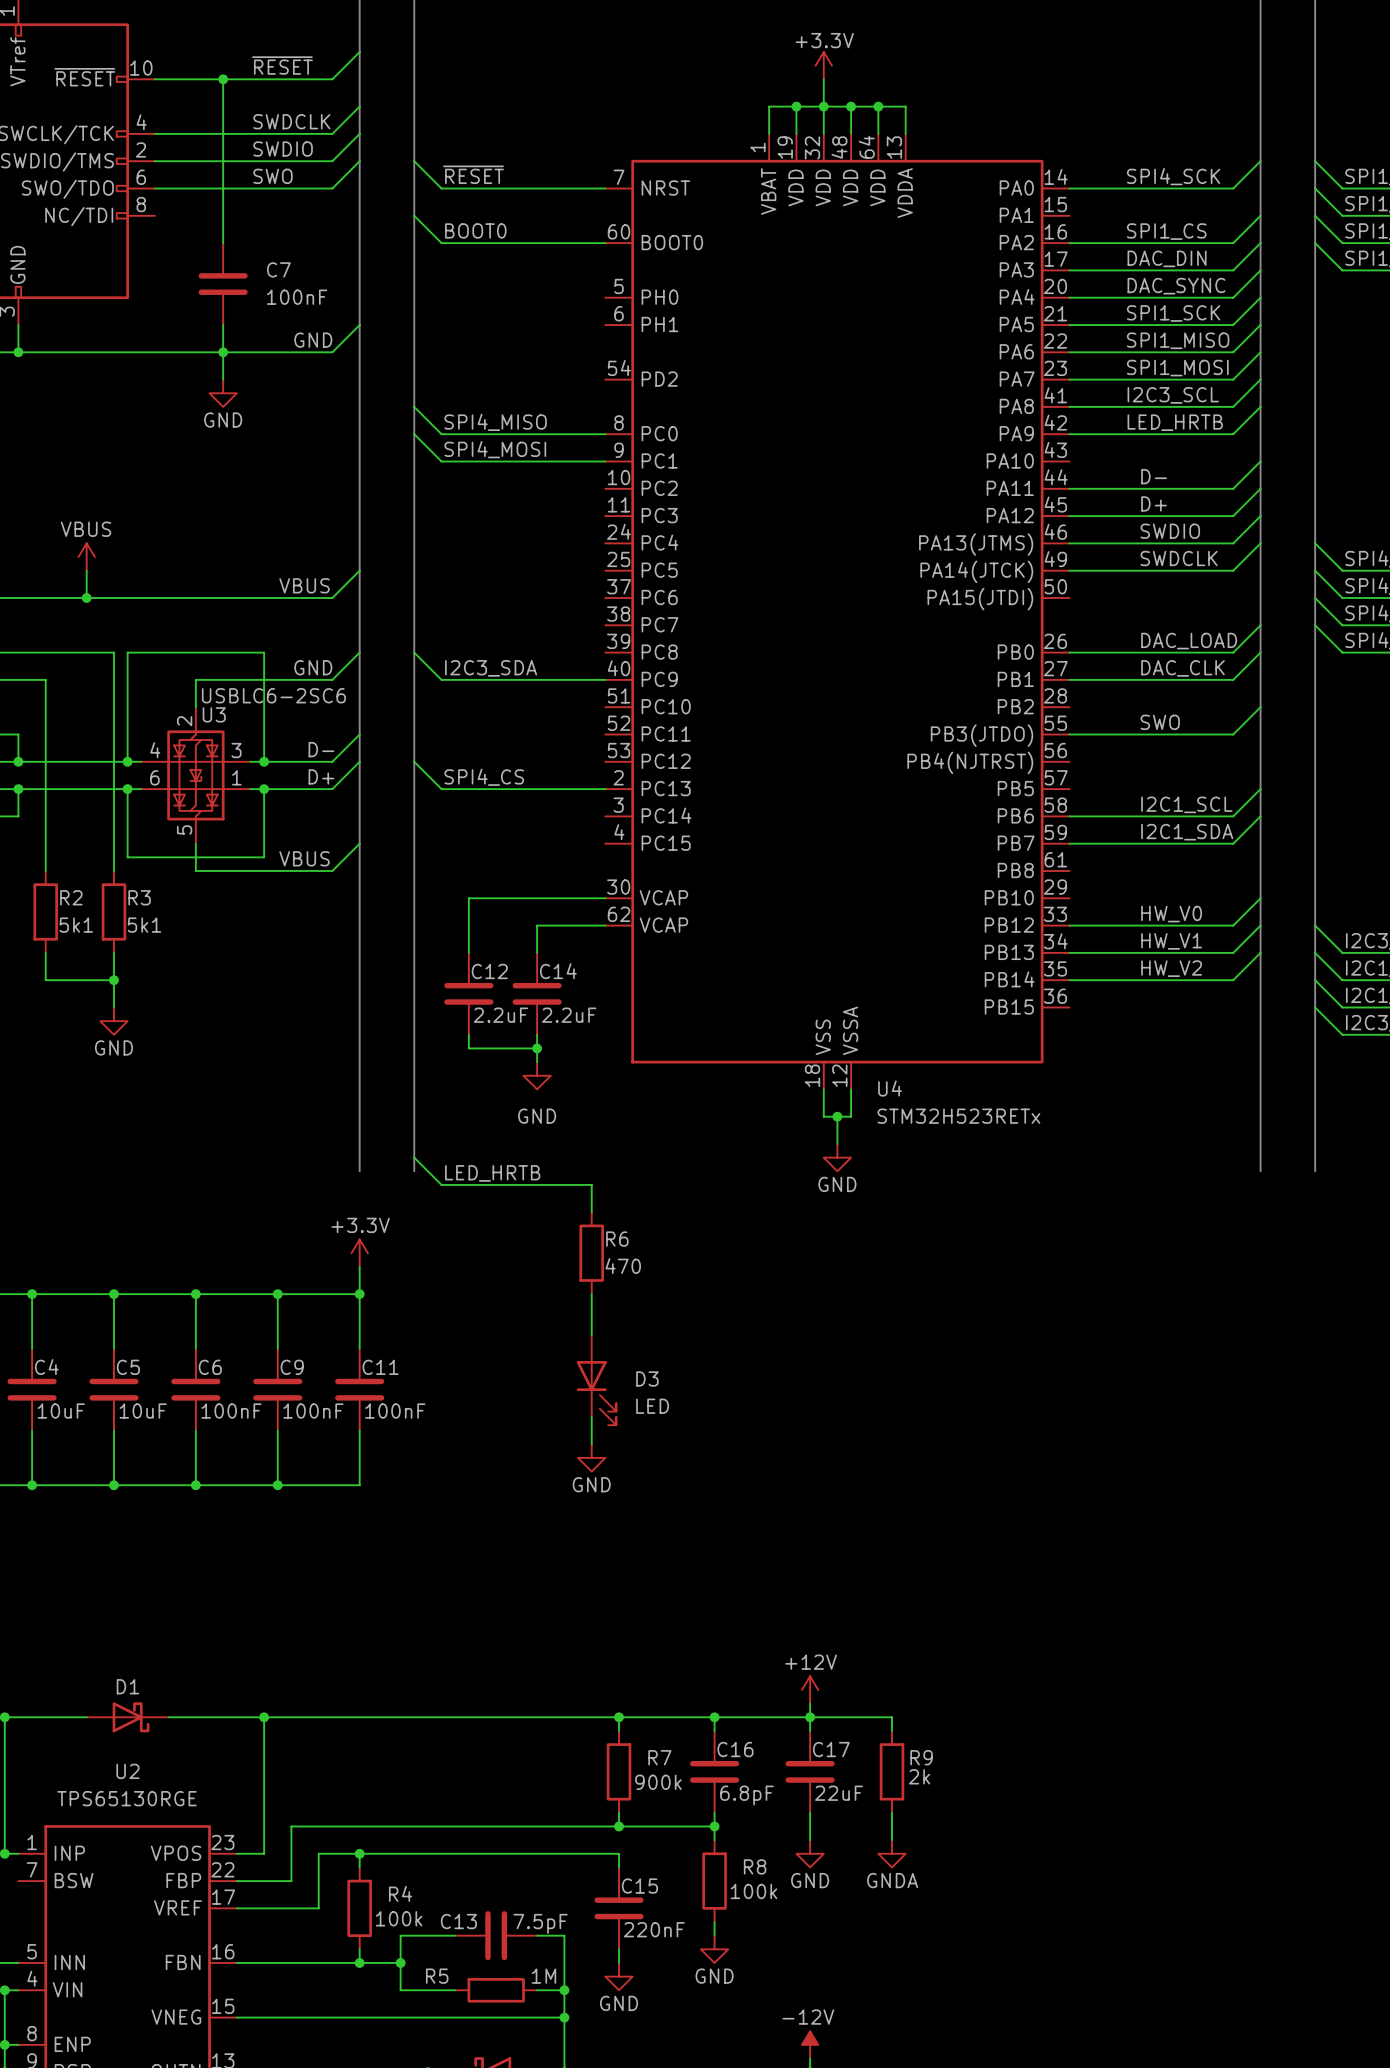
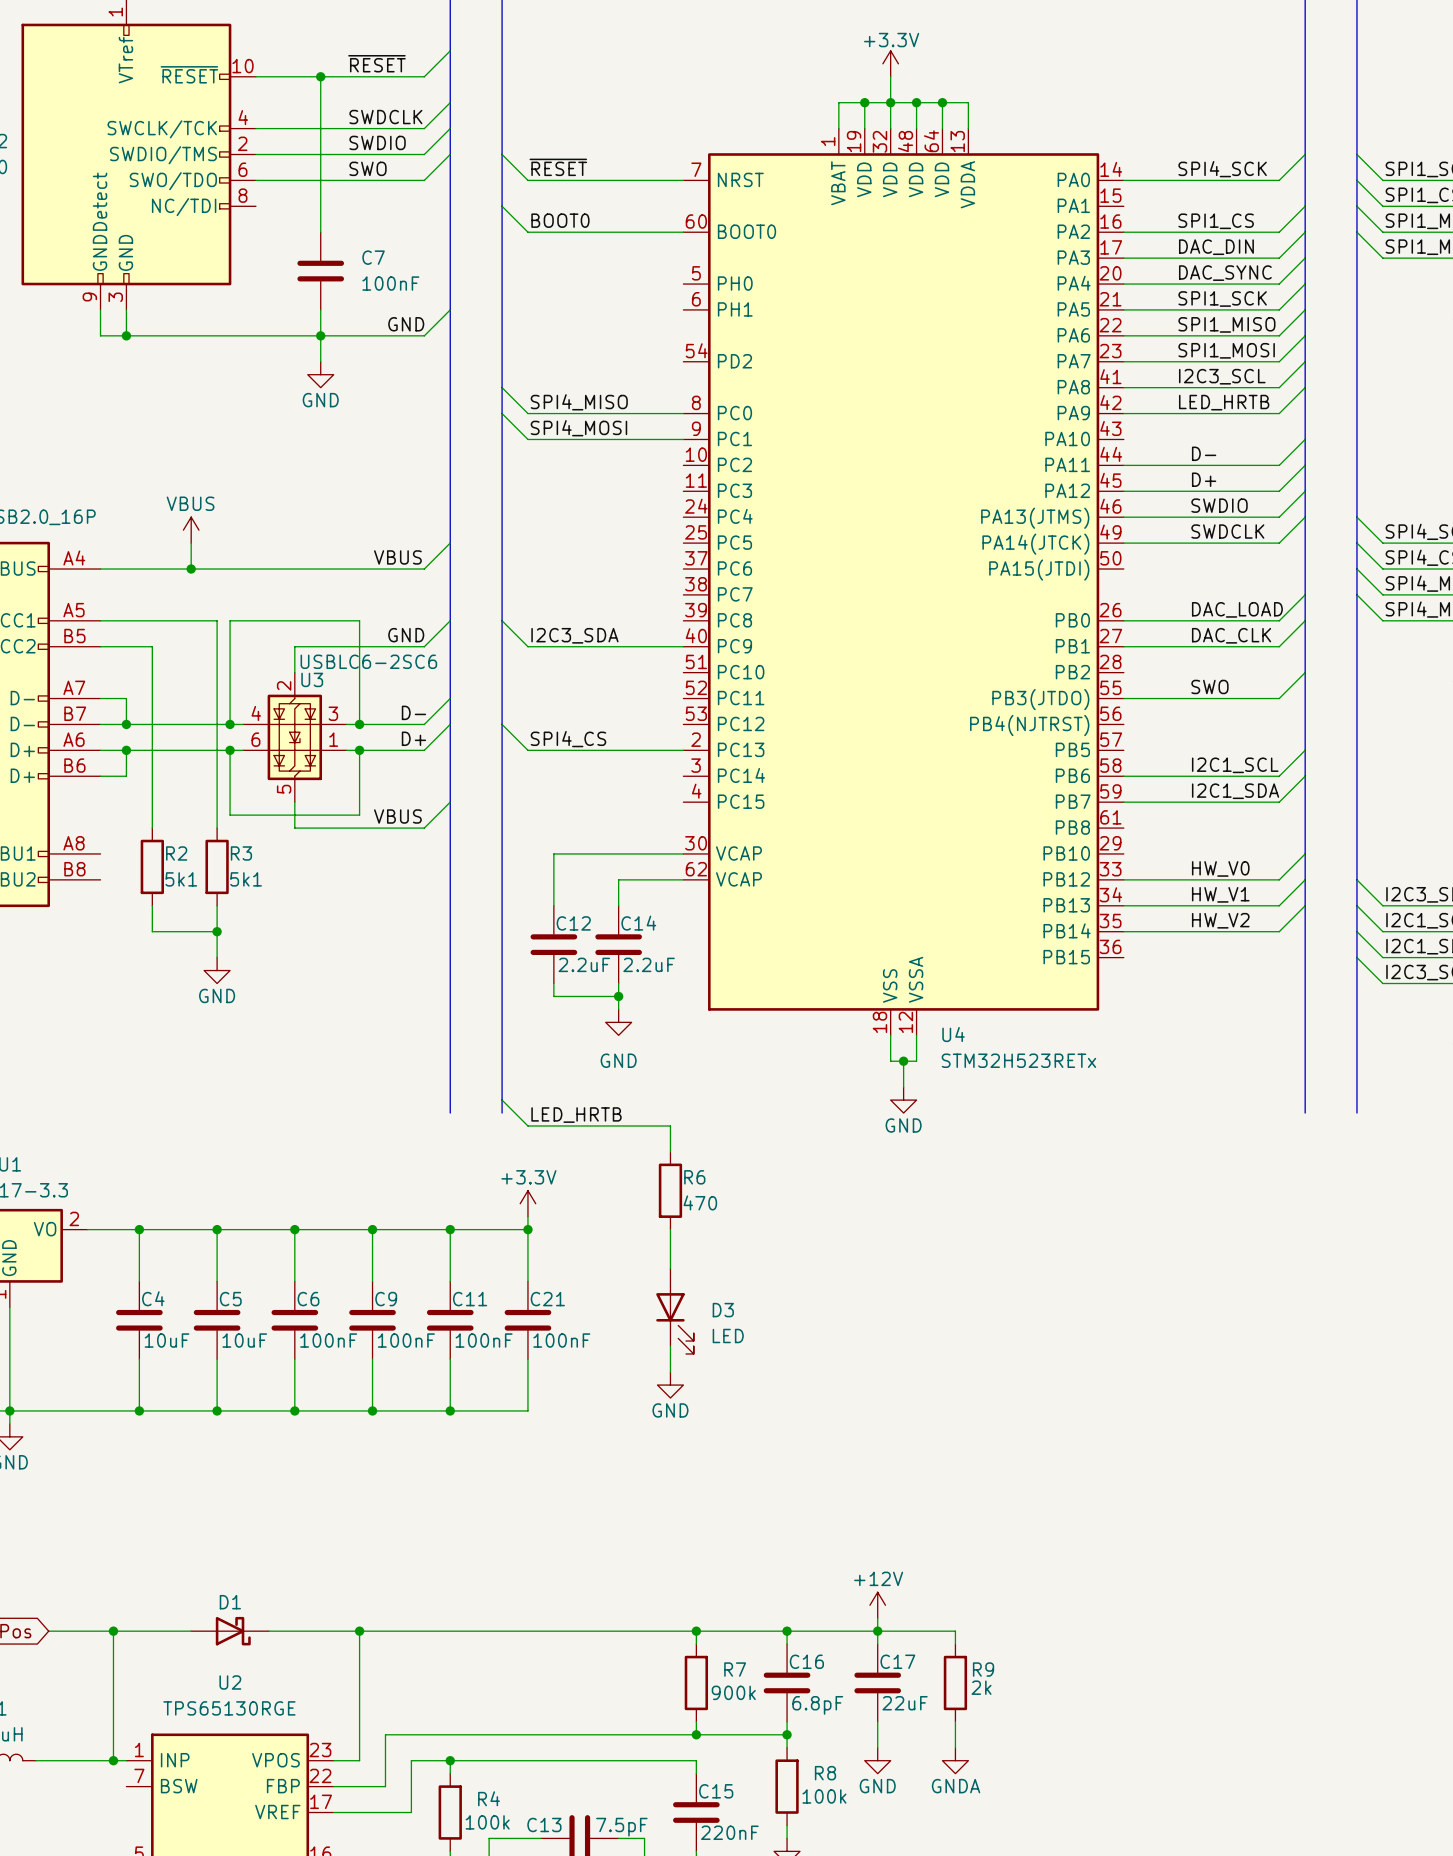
power symbol position: +3.3V (359, 1253) -> +3.3V (527, 1203)
wire: (359, 1266) (359, 1294) -> (527, 1229) (450, 1229)
wire: none -> (527, 1216) (527, 1281)
junction: none -> (527, 1229)
C21: none -> 100nF (527, 1320)
wire: none -> (527, 1359) (527, 1410) (450, 1410)
junction: none -> (450, 1410)

